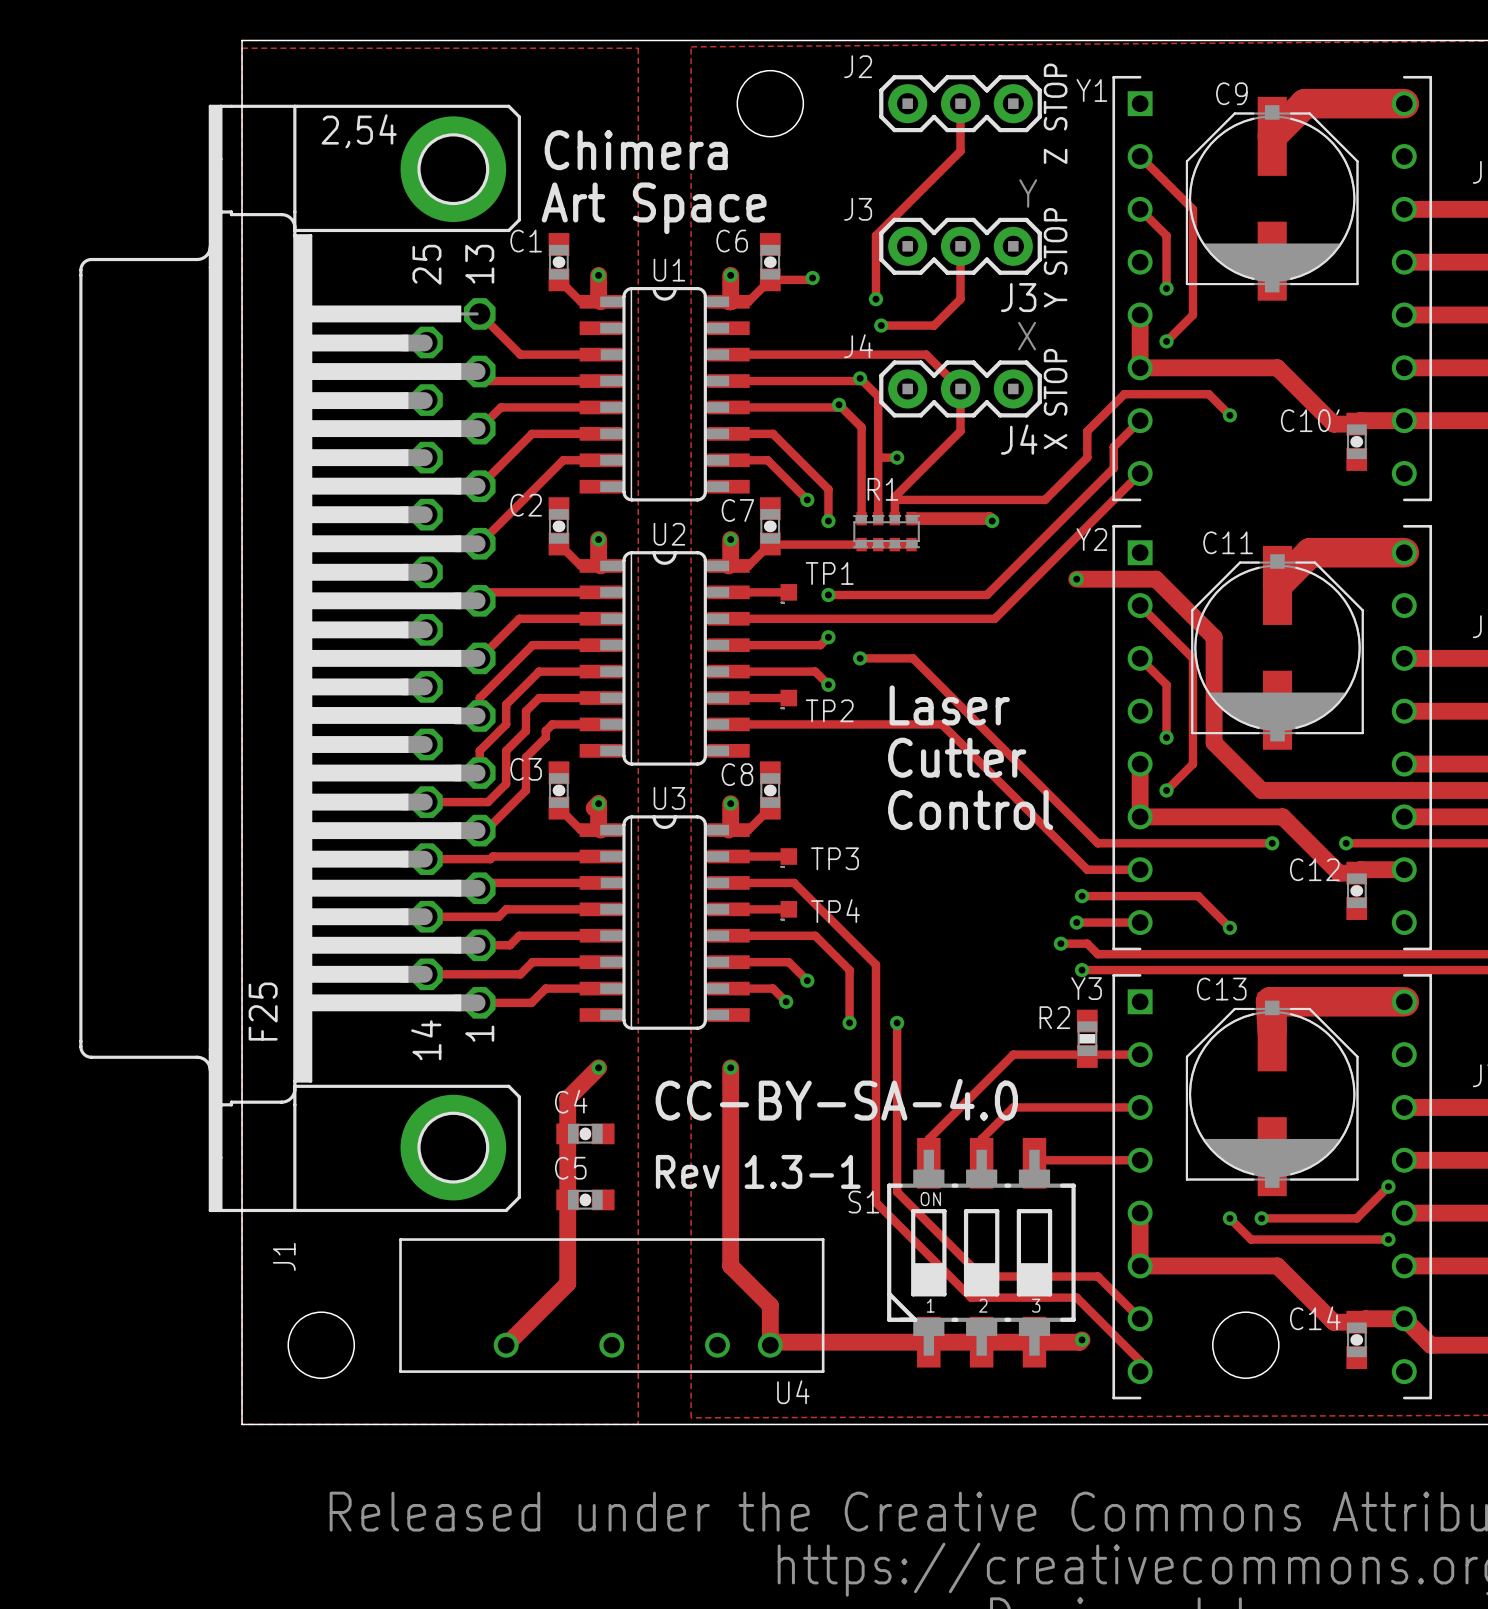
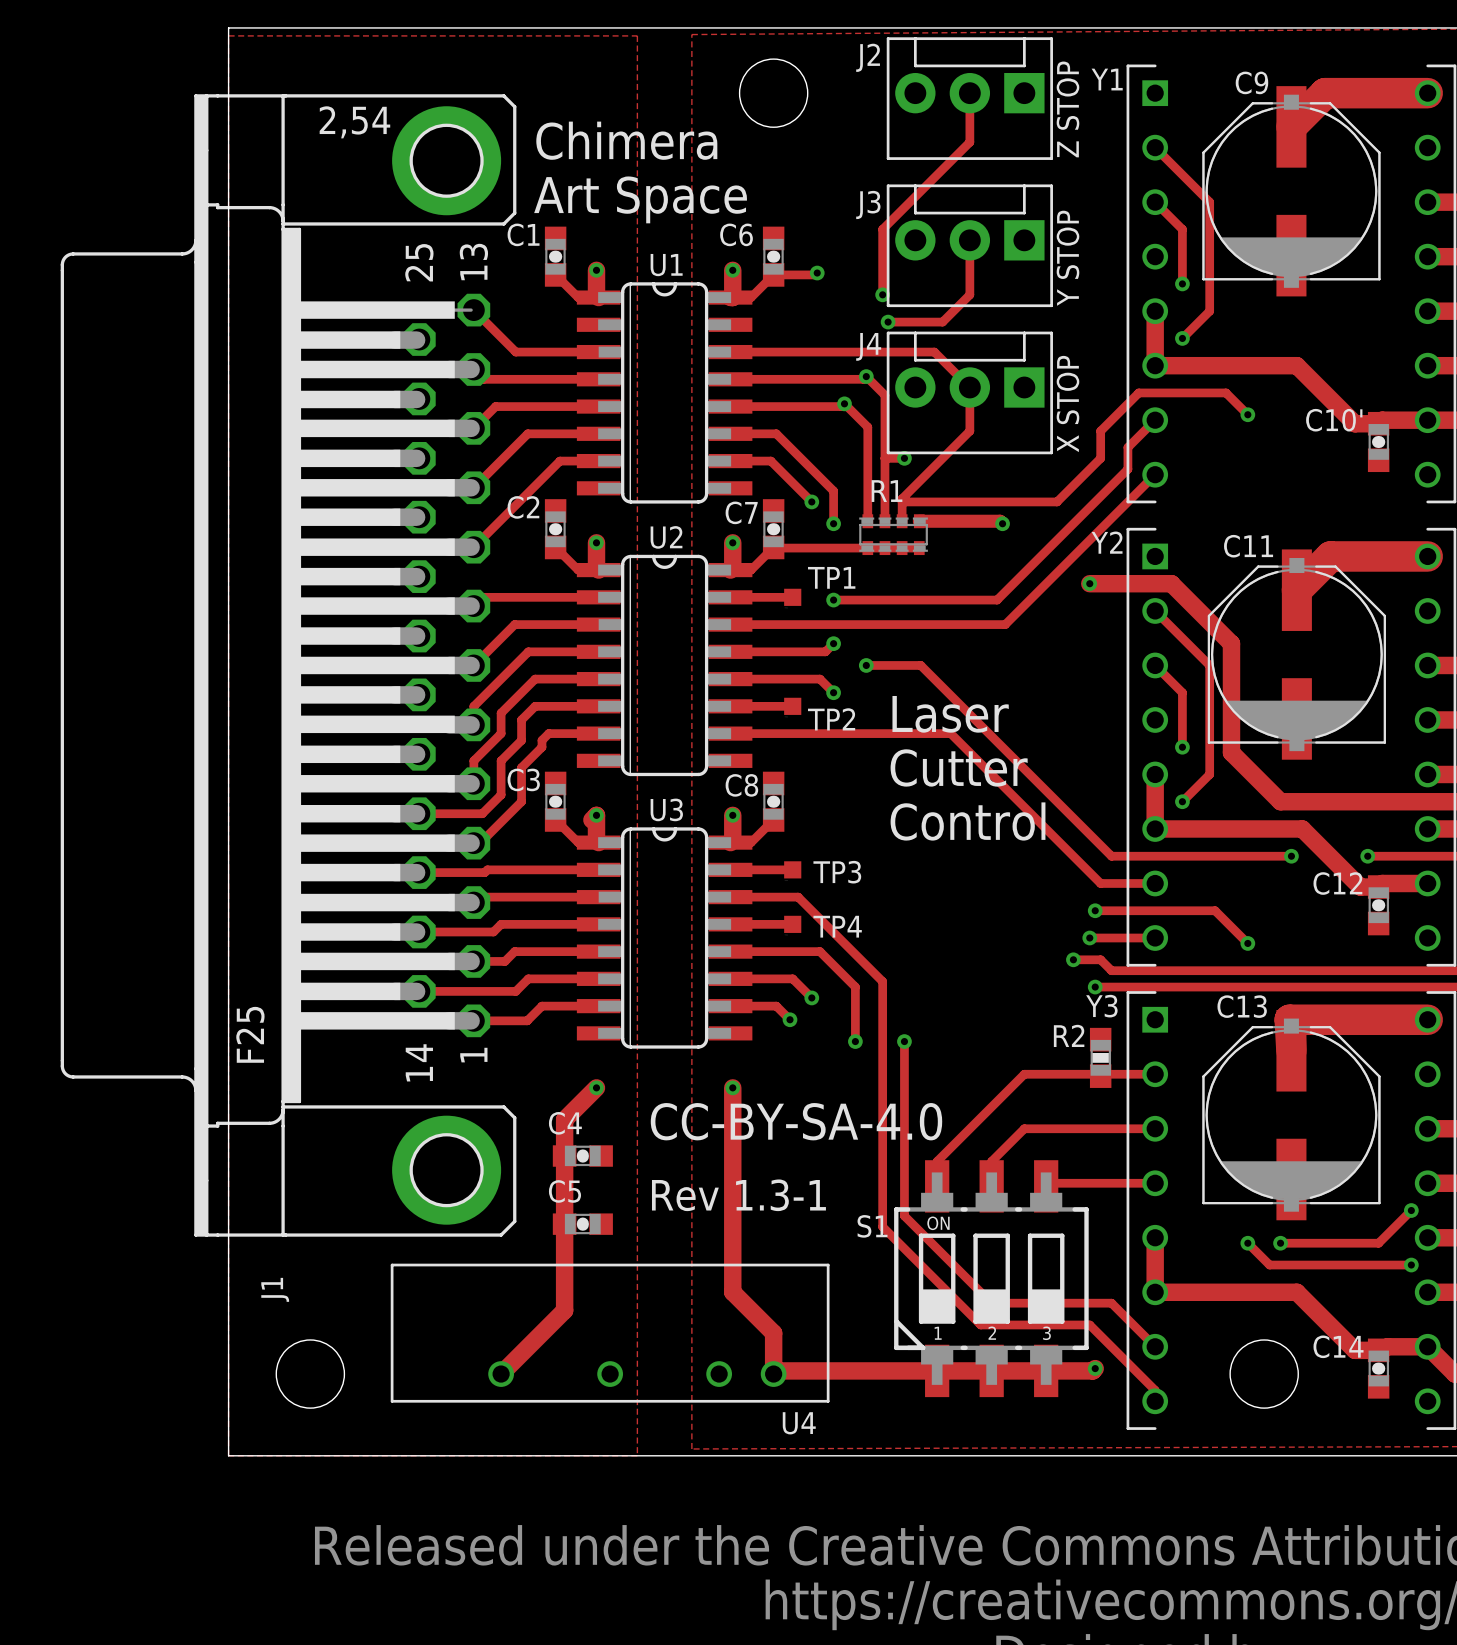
part footprint: [879, 75, 1042, 133] -> [886, 37, 1053, 160]
J3: Y (960, 246) -> none
part: none -> (969, 245)
J4: X (960, 388) -> none
part: none -> (969, 392)

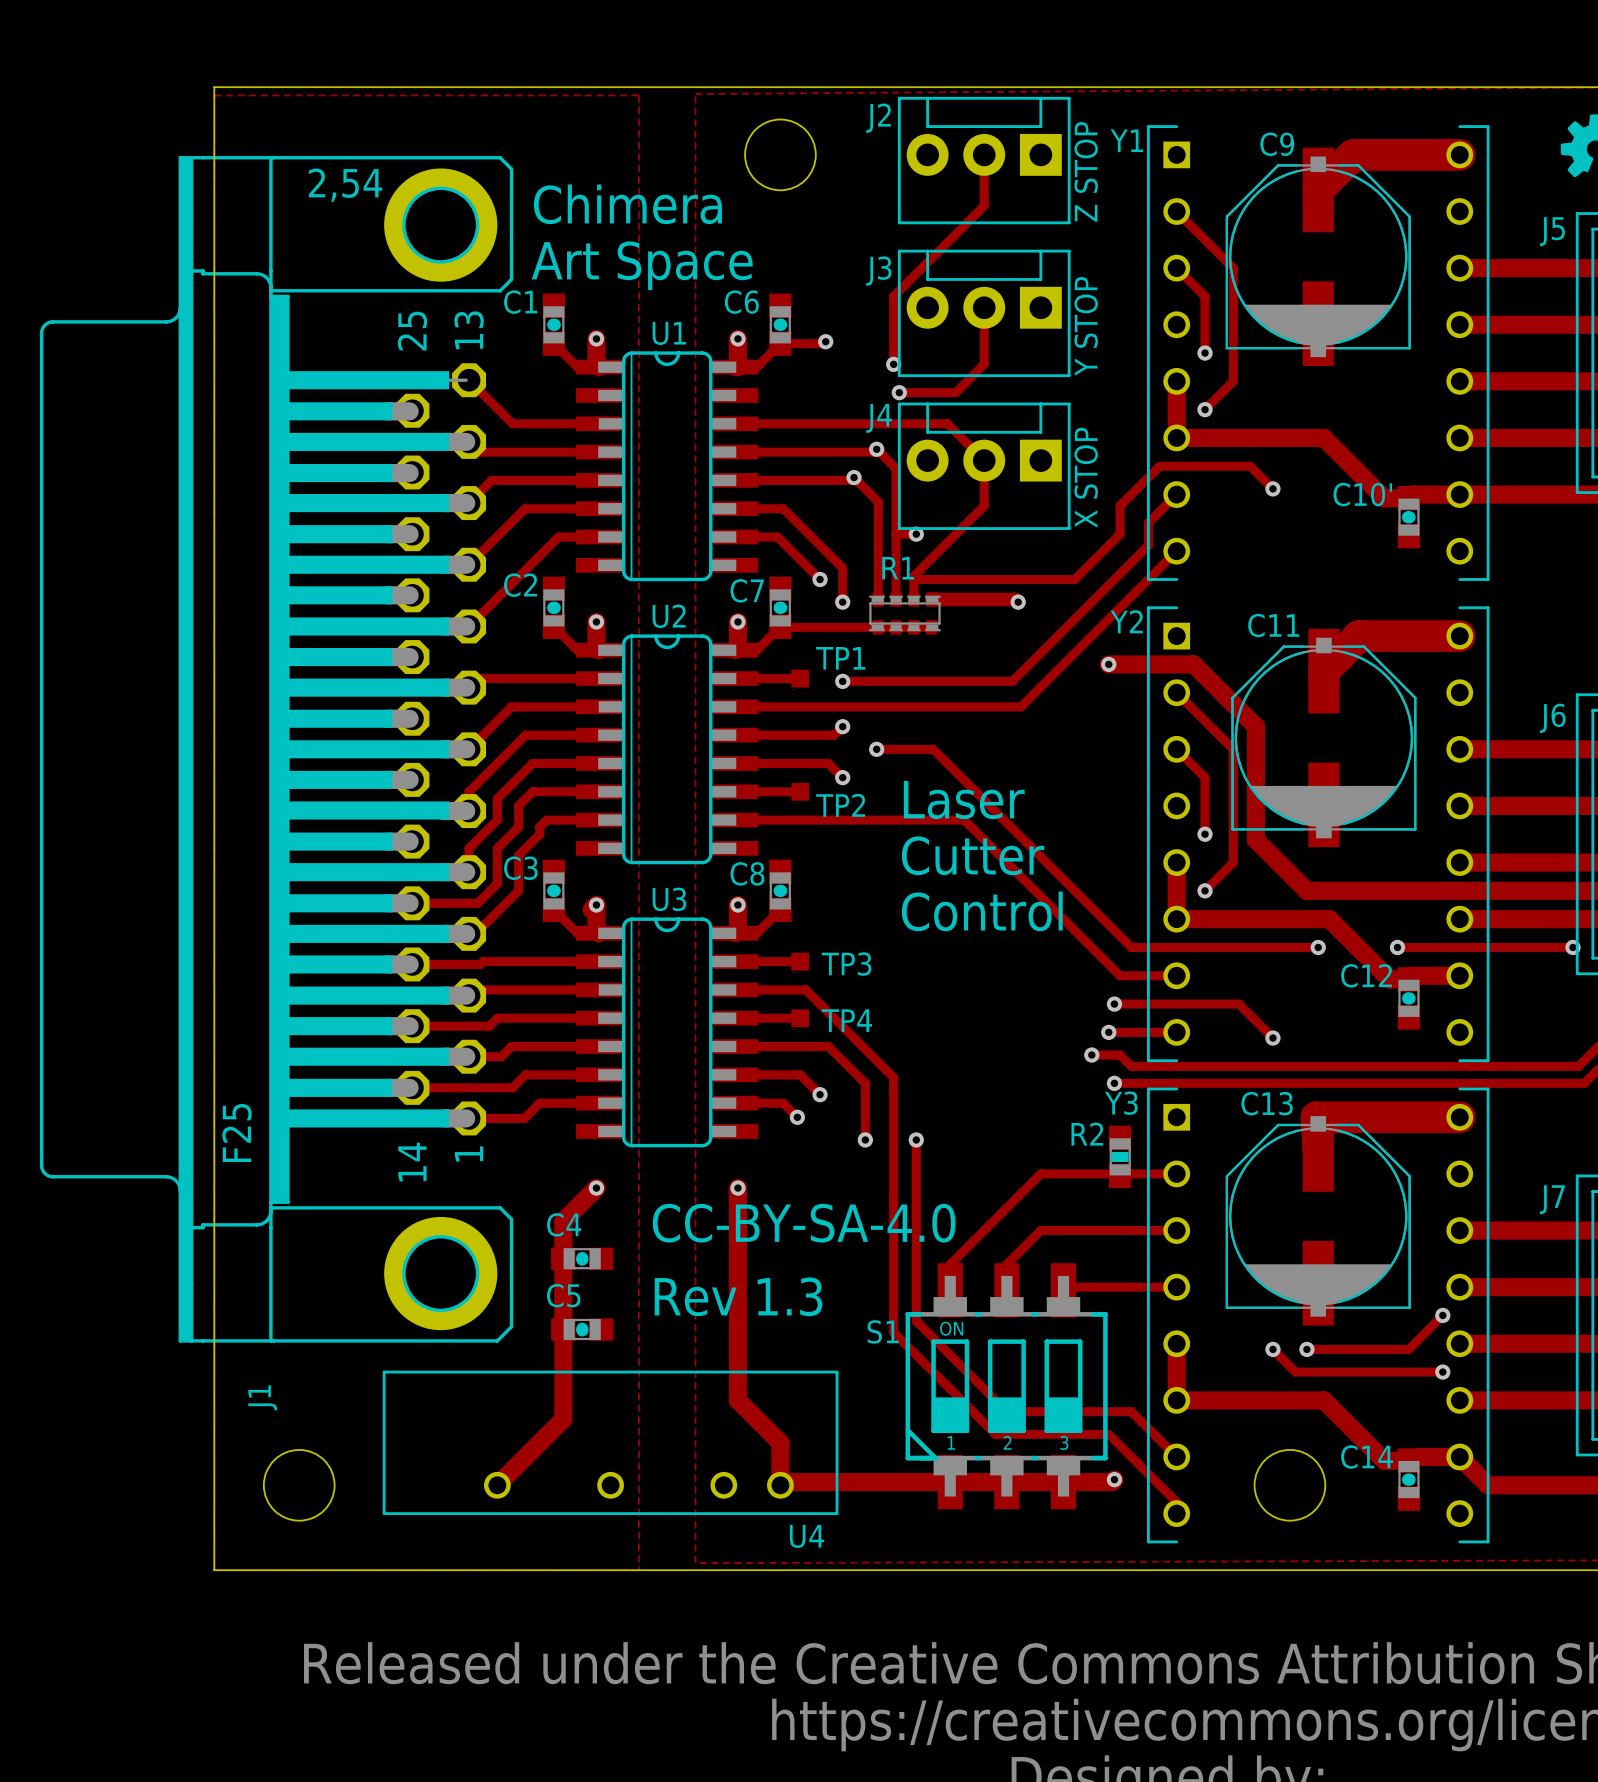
text: Rev 1.3-1 (738, 1195) -> Rev 1.3 (738, 1296)

